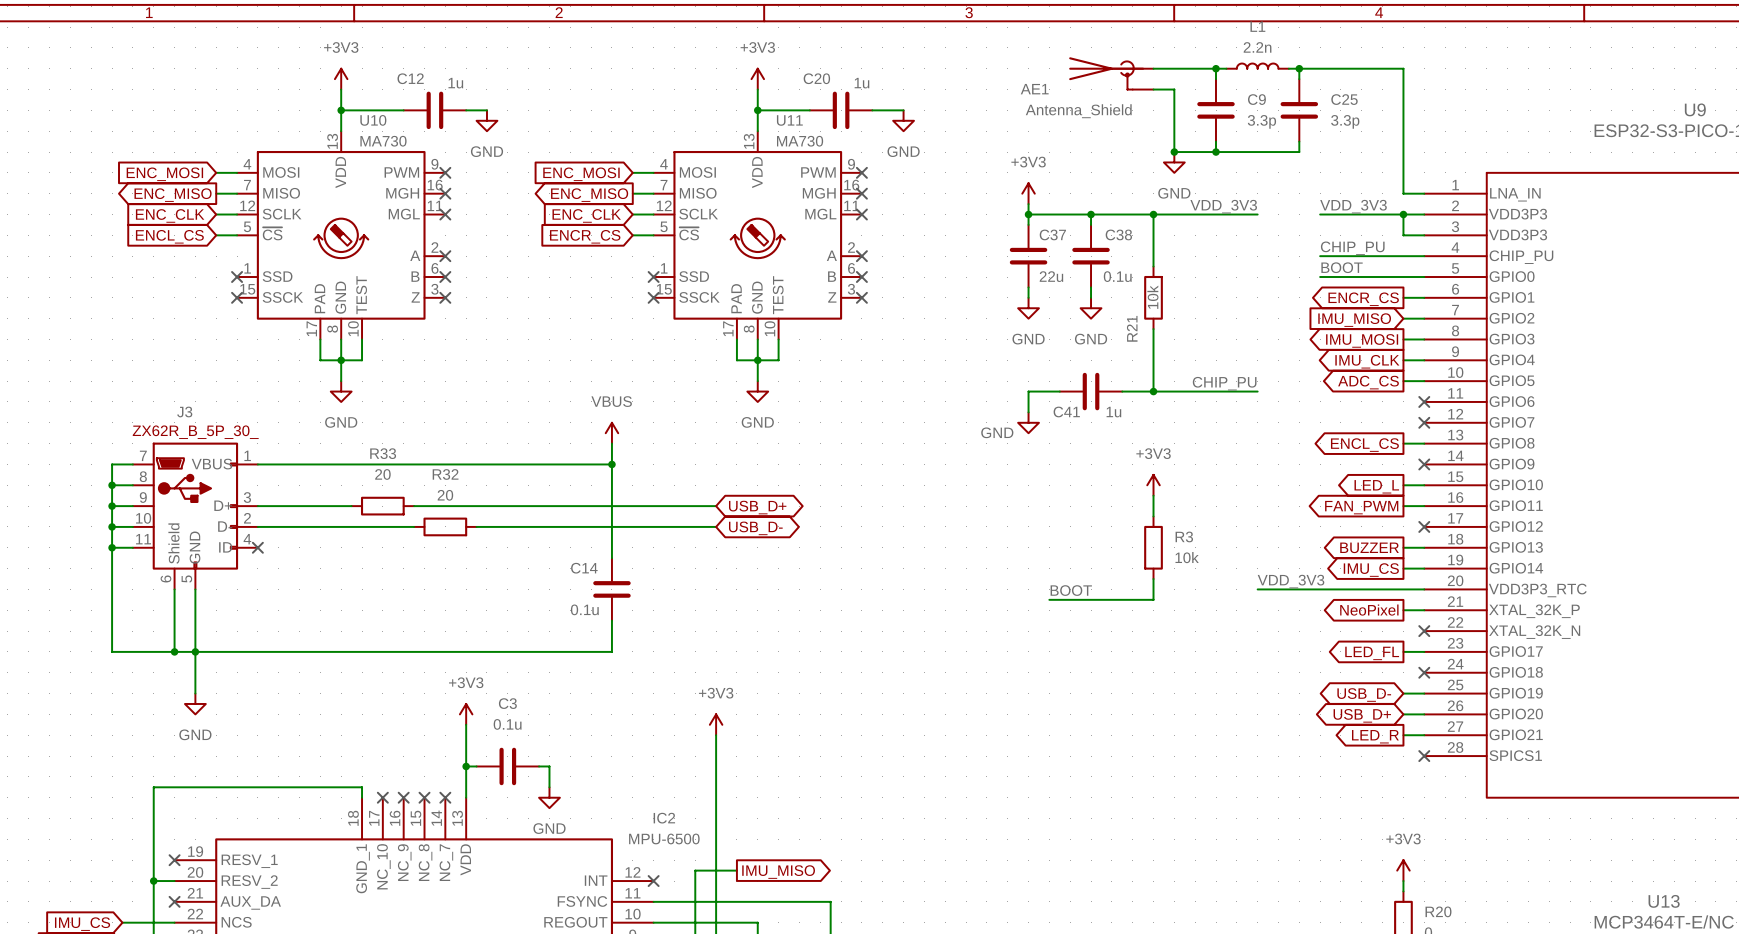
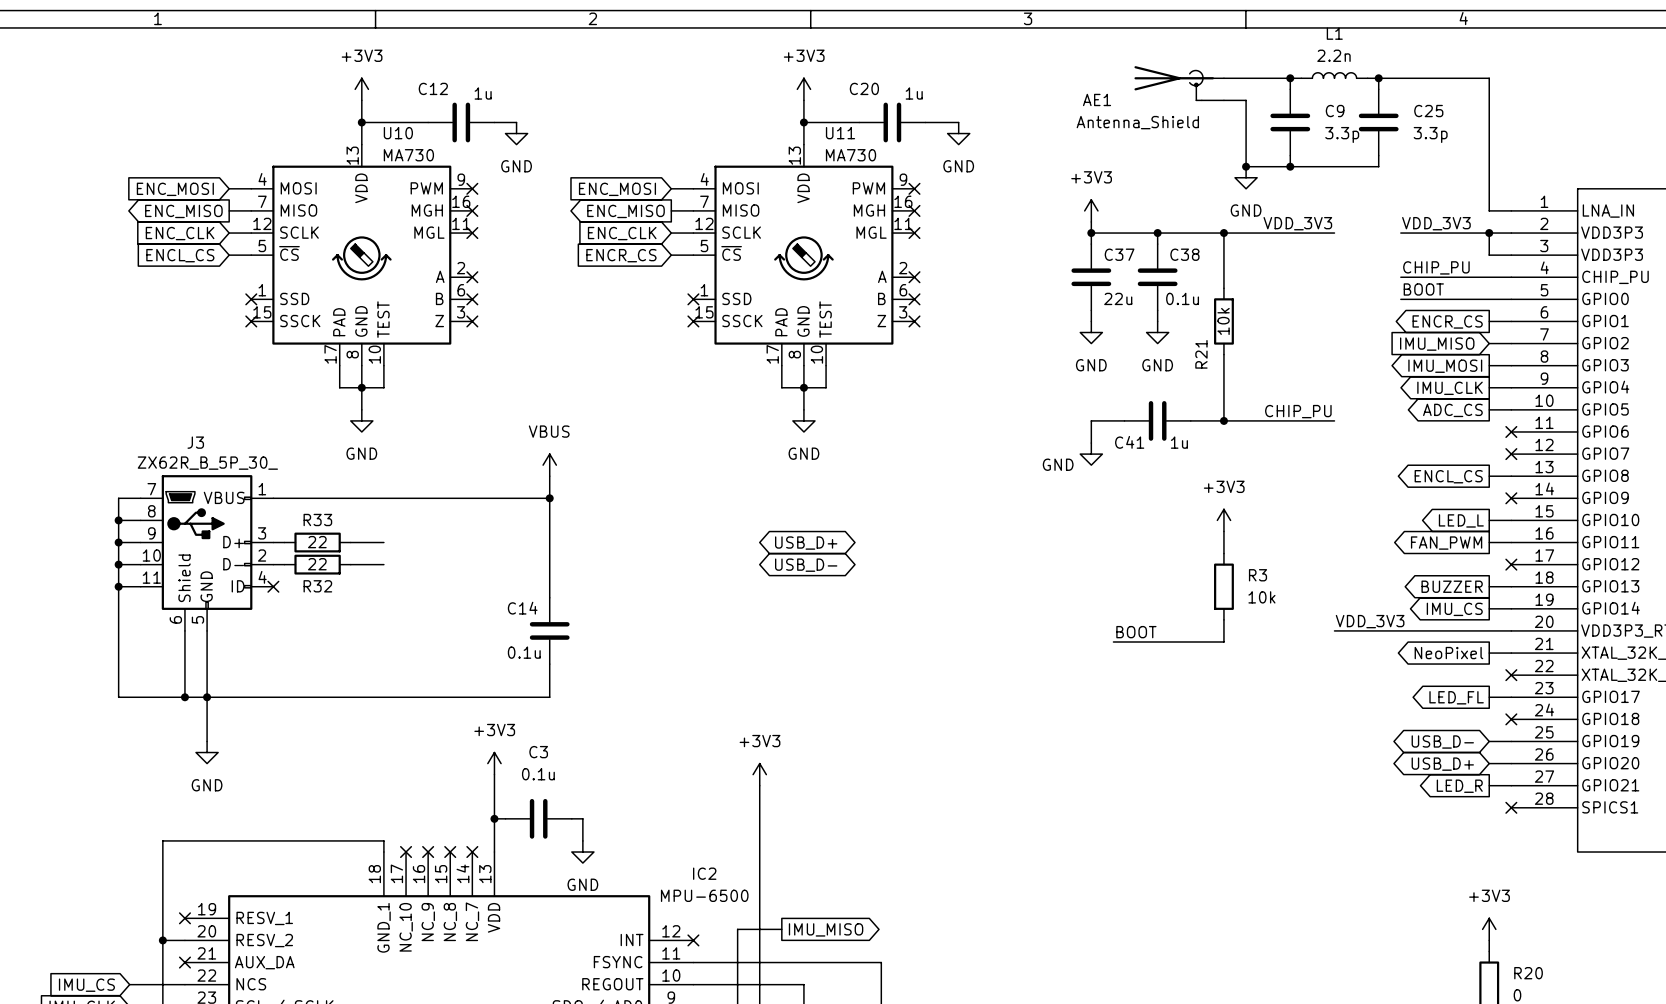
power symbol position: VBUS (611, 433) -> VBUS (549, 465)
wire: (611, 443) (611, 558) -> (549, 476) (549, 597)
R33 name position: R33 (383, 453) -> R33 (317, 520)
wire: (518, 464) (611, 464) -> none
junction: none -> (549, 498)
junction: (611, 464) -> none
R33 value: 20 (382, 474) -> 22 (317, 542)
R32 name position: R32 (445, 474) -> R32 (317, 586)
R32 value: 20 (445, 495) -> 22 (317, 564)
wire: (268, 506) (330, 506) -> none
R33 position: (382, 506) -> (317, 542)
wire: (414, 506) (716, 506) -> none
wire: (268, 526) (330, 526) -> none
wire: (362, 526) (414, 526) -> none
R32 position: (445, 526) -> (317, 564)
wire: (476, 526) (716, 526) -> none
C14 position: (611, 589) -> (549, 630)
wire: (611, 620) (611, 651) (518, 651) -> (549, 664) (549, 697)

